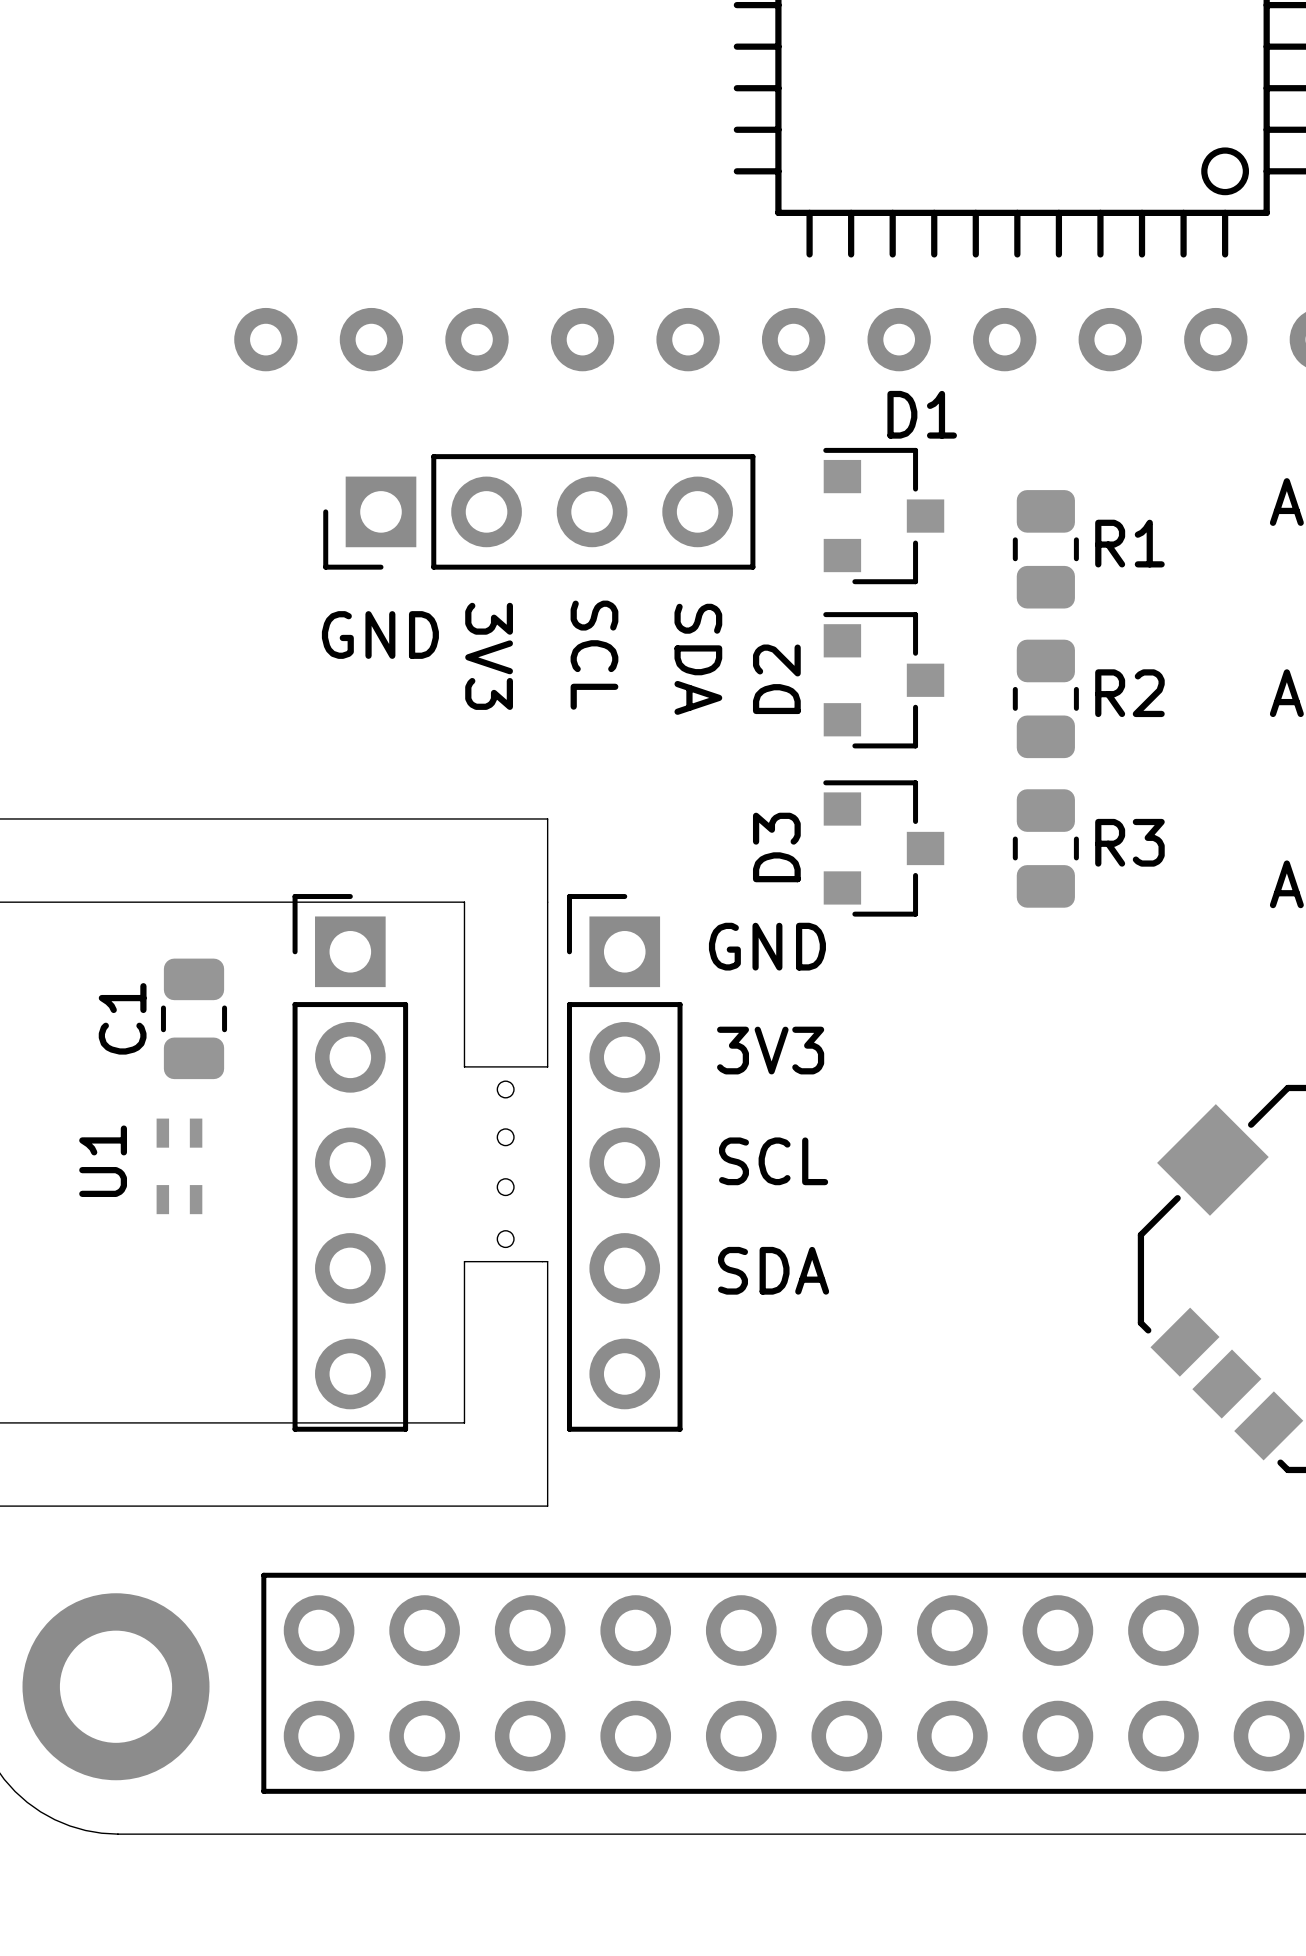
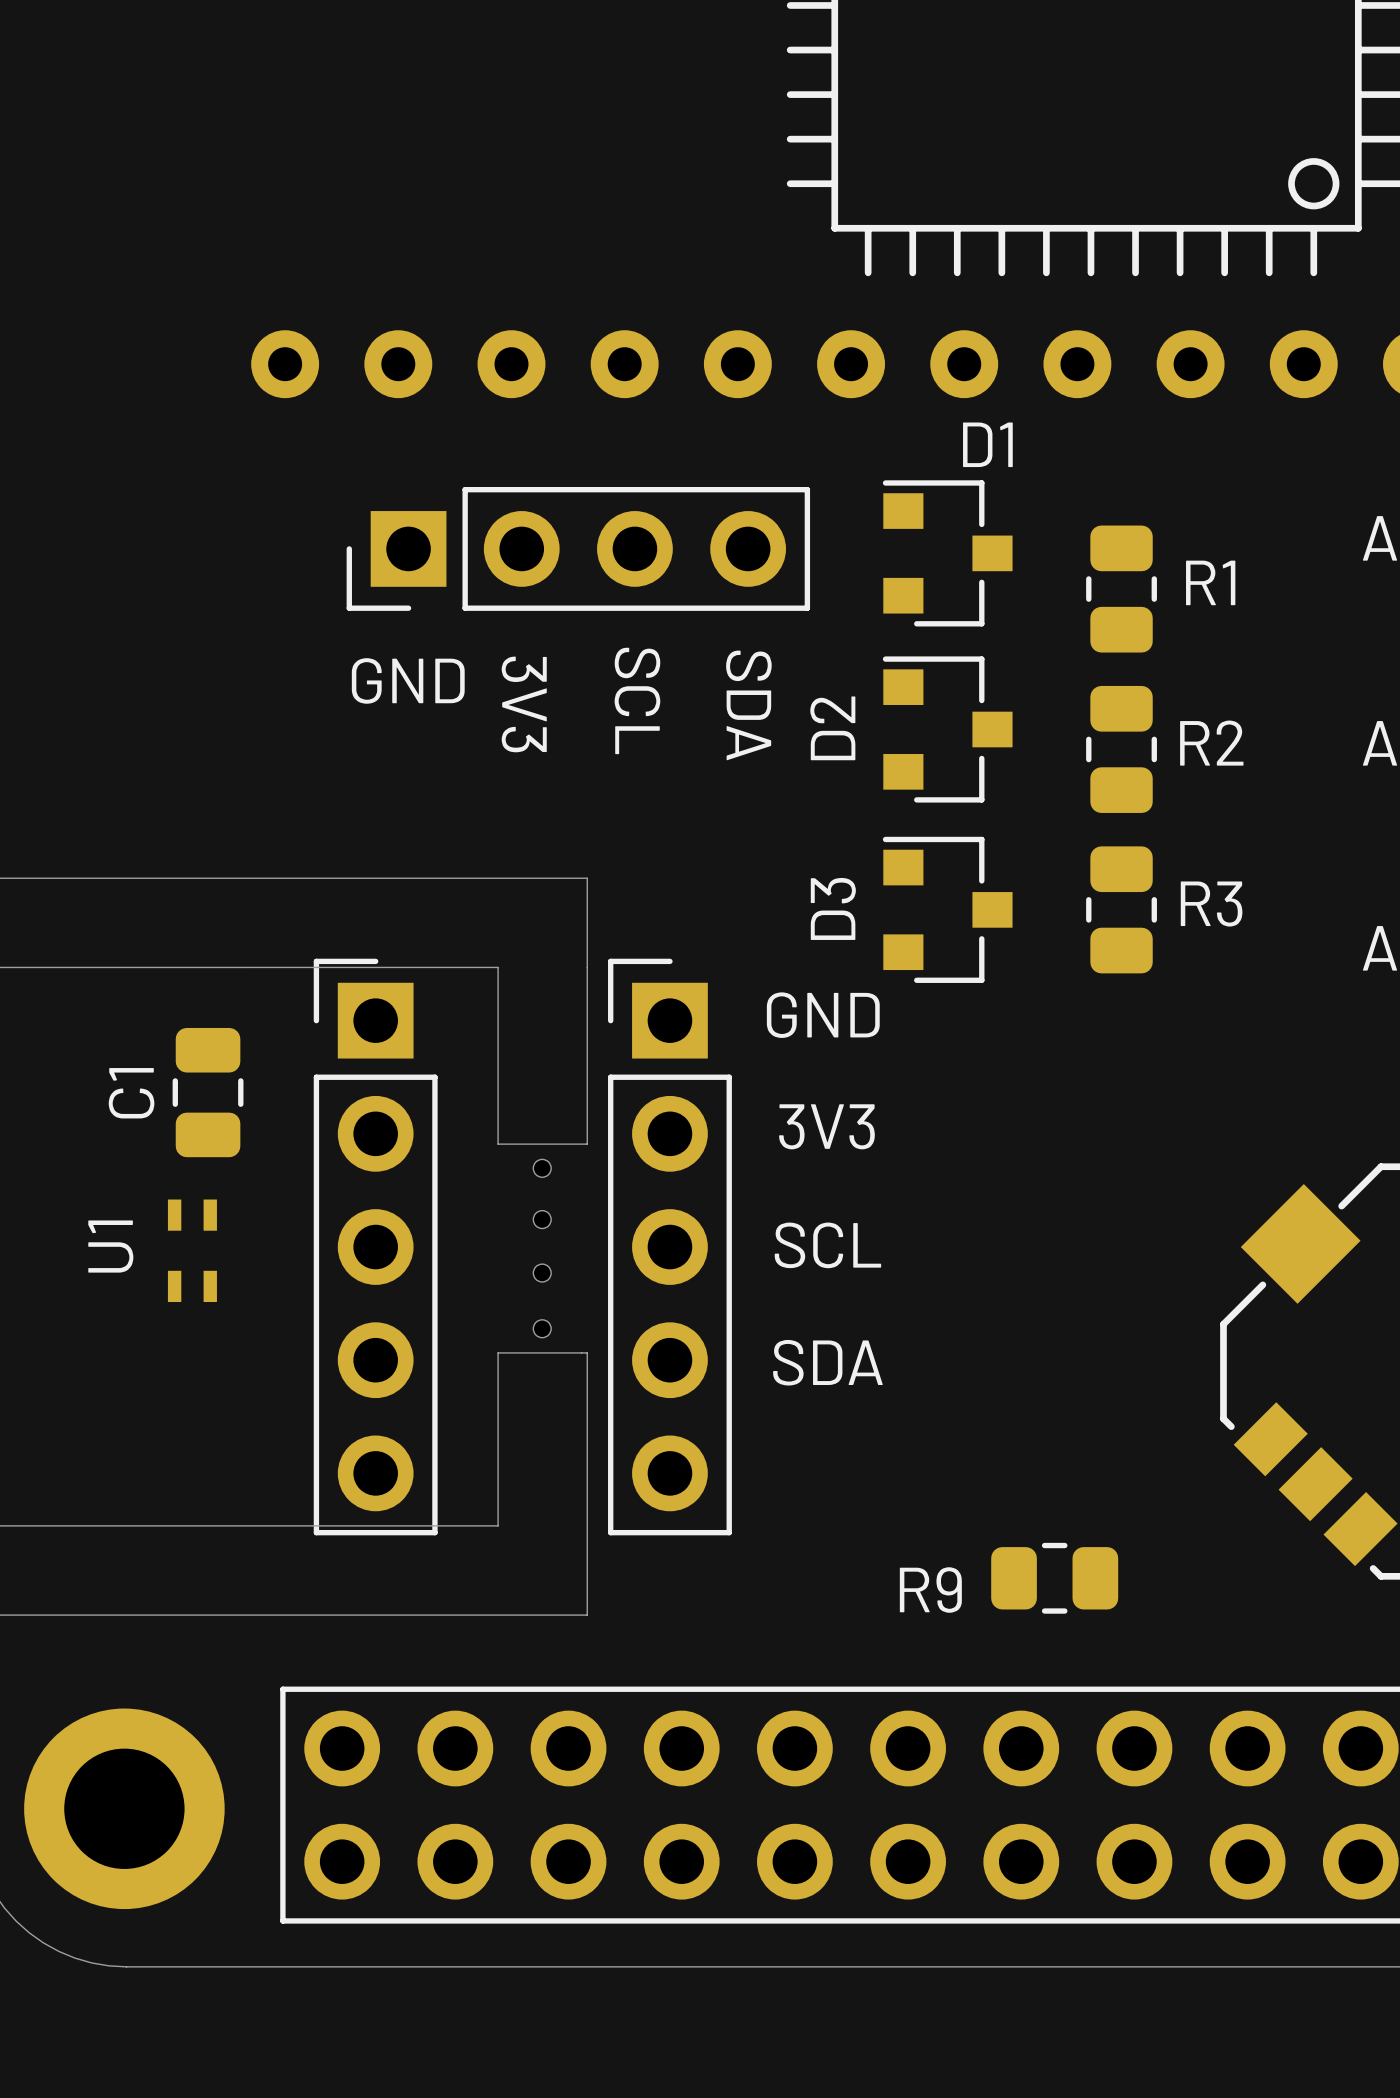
R9: none -> (1054, 1578)

